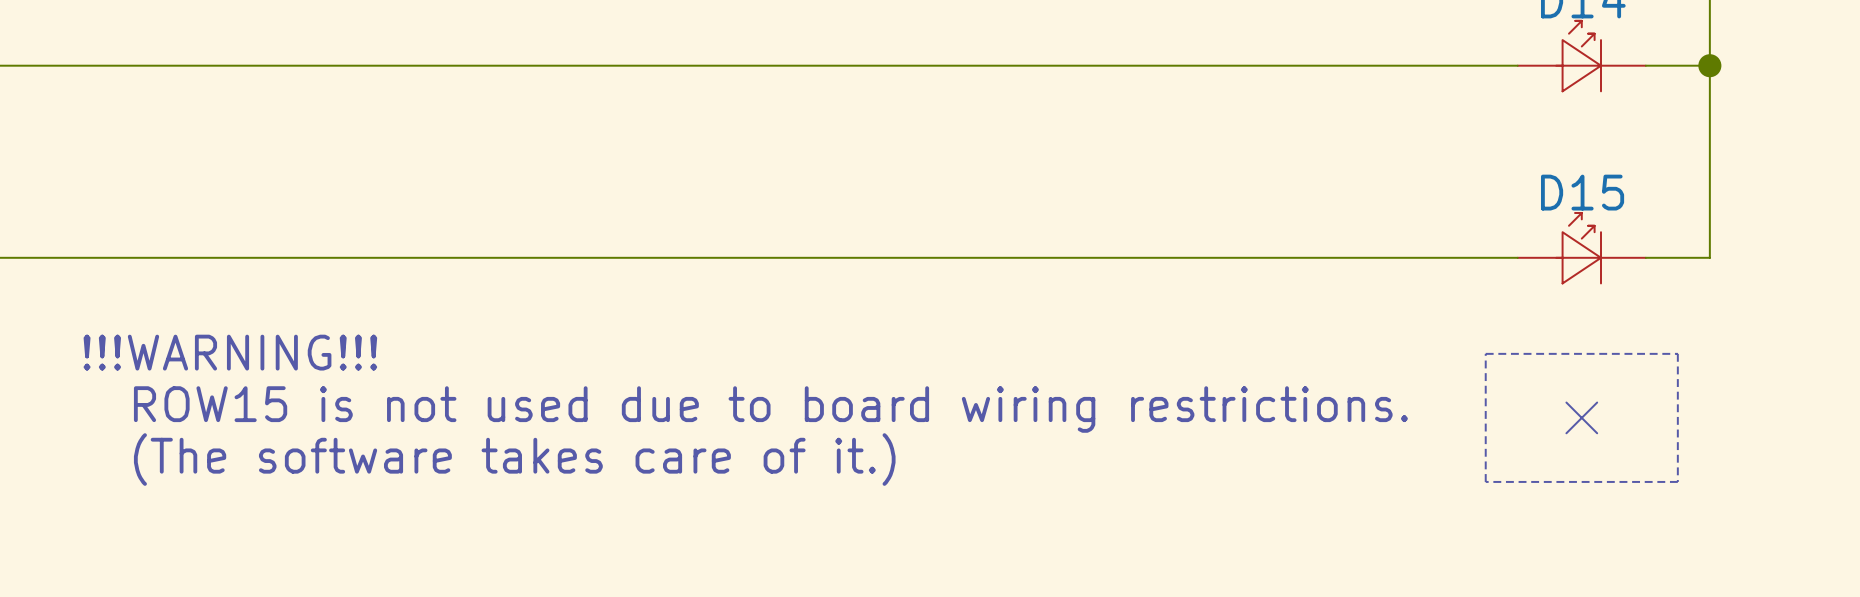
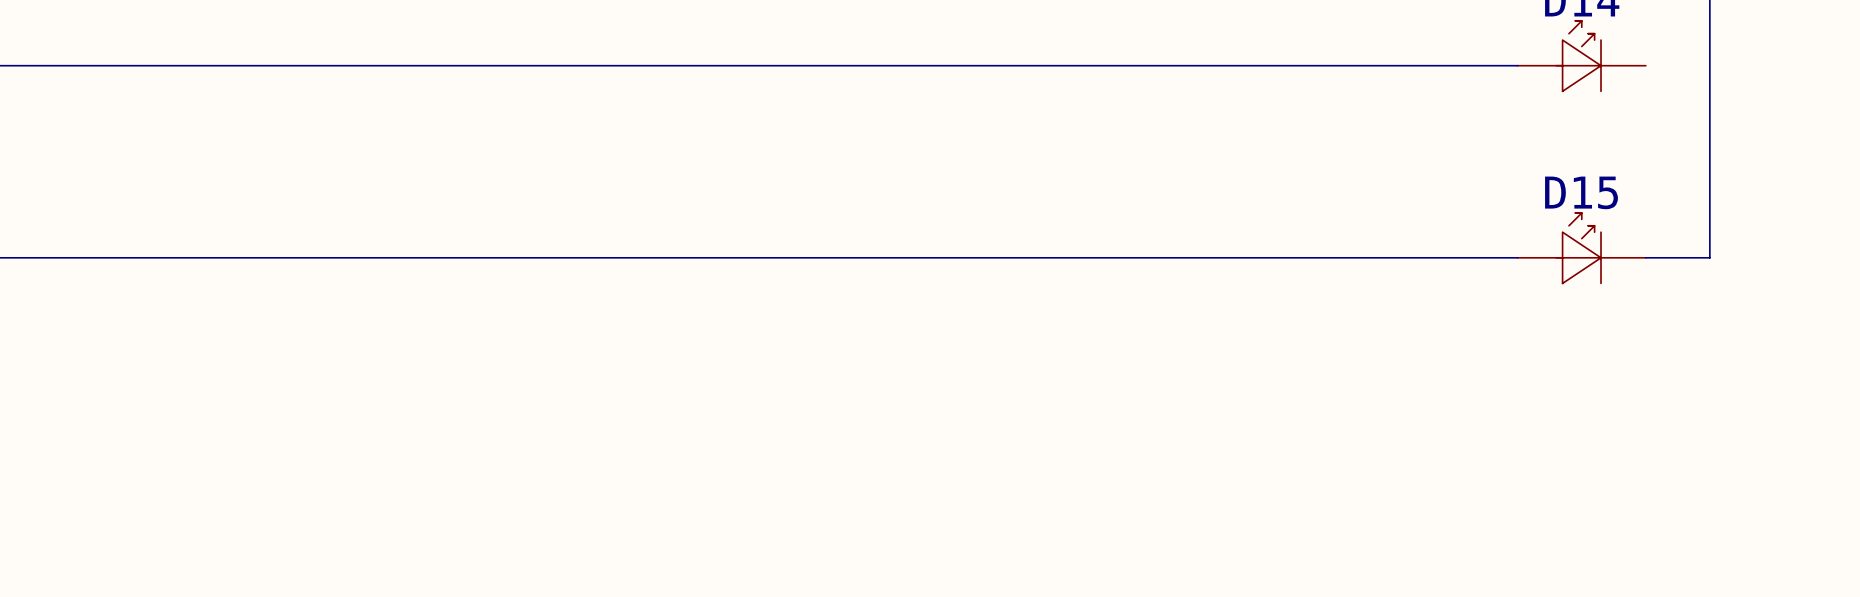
wire: (1645, 65) (1709, 65) -> none
junction: (1709, 65) -> none
text: !!!WARNING!!! (230, 352) -> none
line: (1485, 353) (1677, 353) (1677, 481) (1485, 481) (1485, 353) -> none
text: ROW15 is not used due to board wiring restrictions. (770, 409) -> none
no-connect mark: (1581, 417) -> none
text: (The software takes care of it.) (514, 459) -> none

